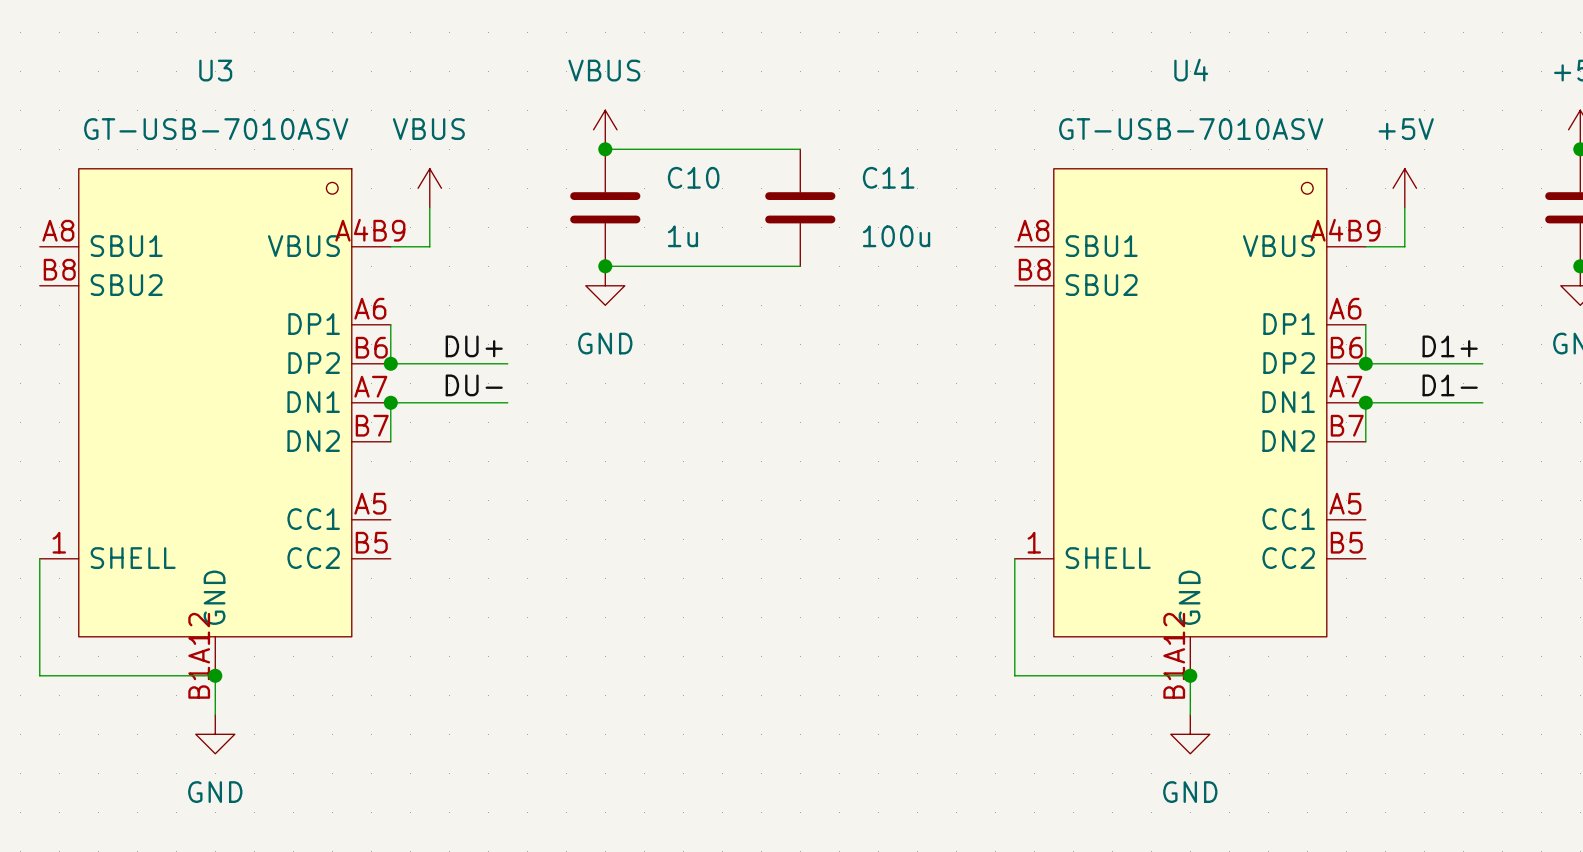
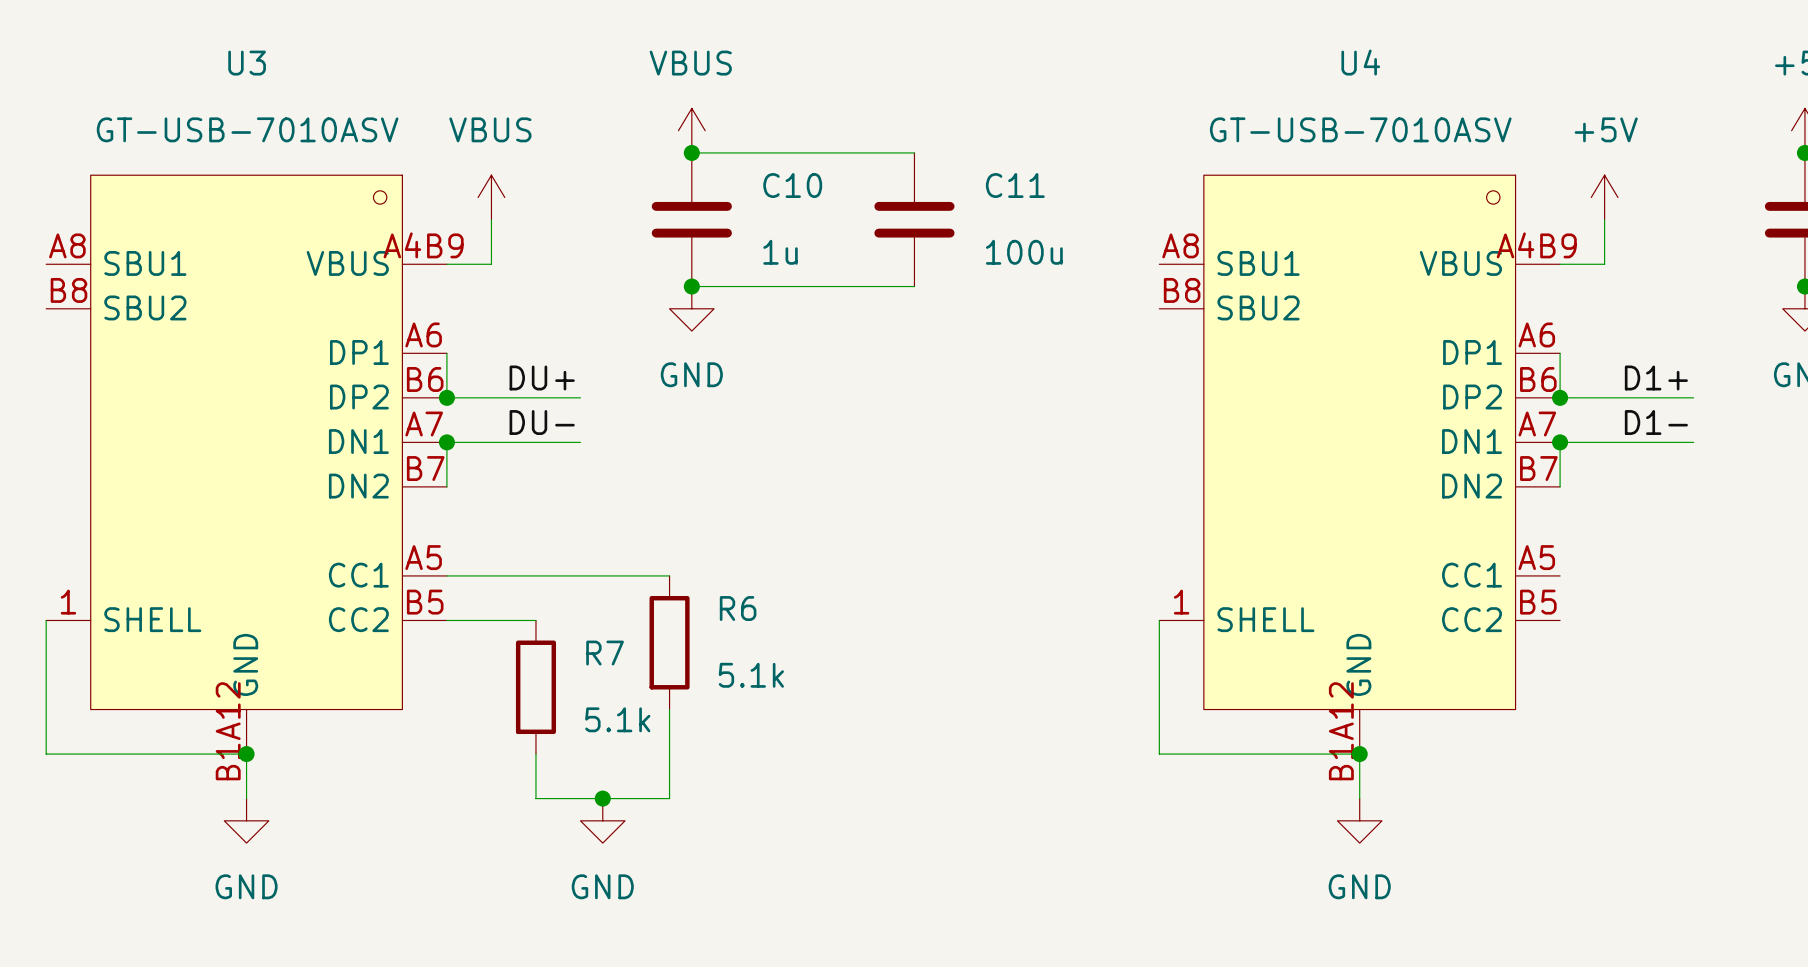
wire: none -> (446, 575) (669, 575)
wire: none -> (446, 620) (535, 620)
R6: none -> 5.1k (669, 642)
R7: none -> 5.1k (535, 687)
wire: none -> (669, 709) (669, 798) (535, 798) (535, 754)
junction: none -> (602, 798)
power symbol: none -> GND (602, 820)

